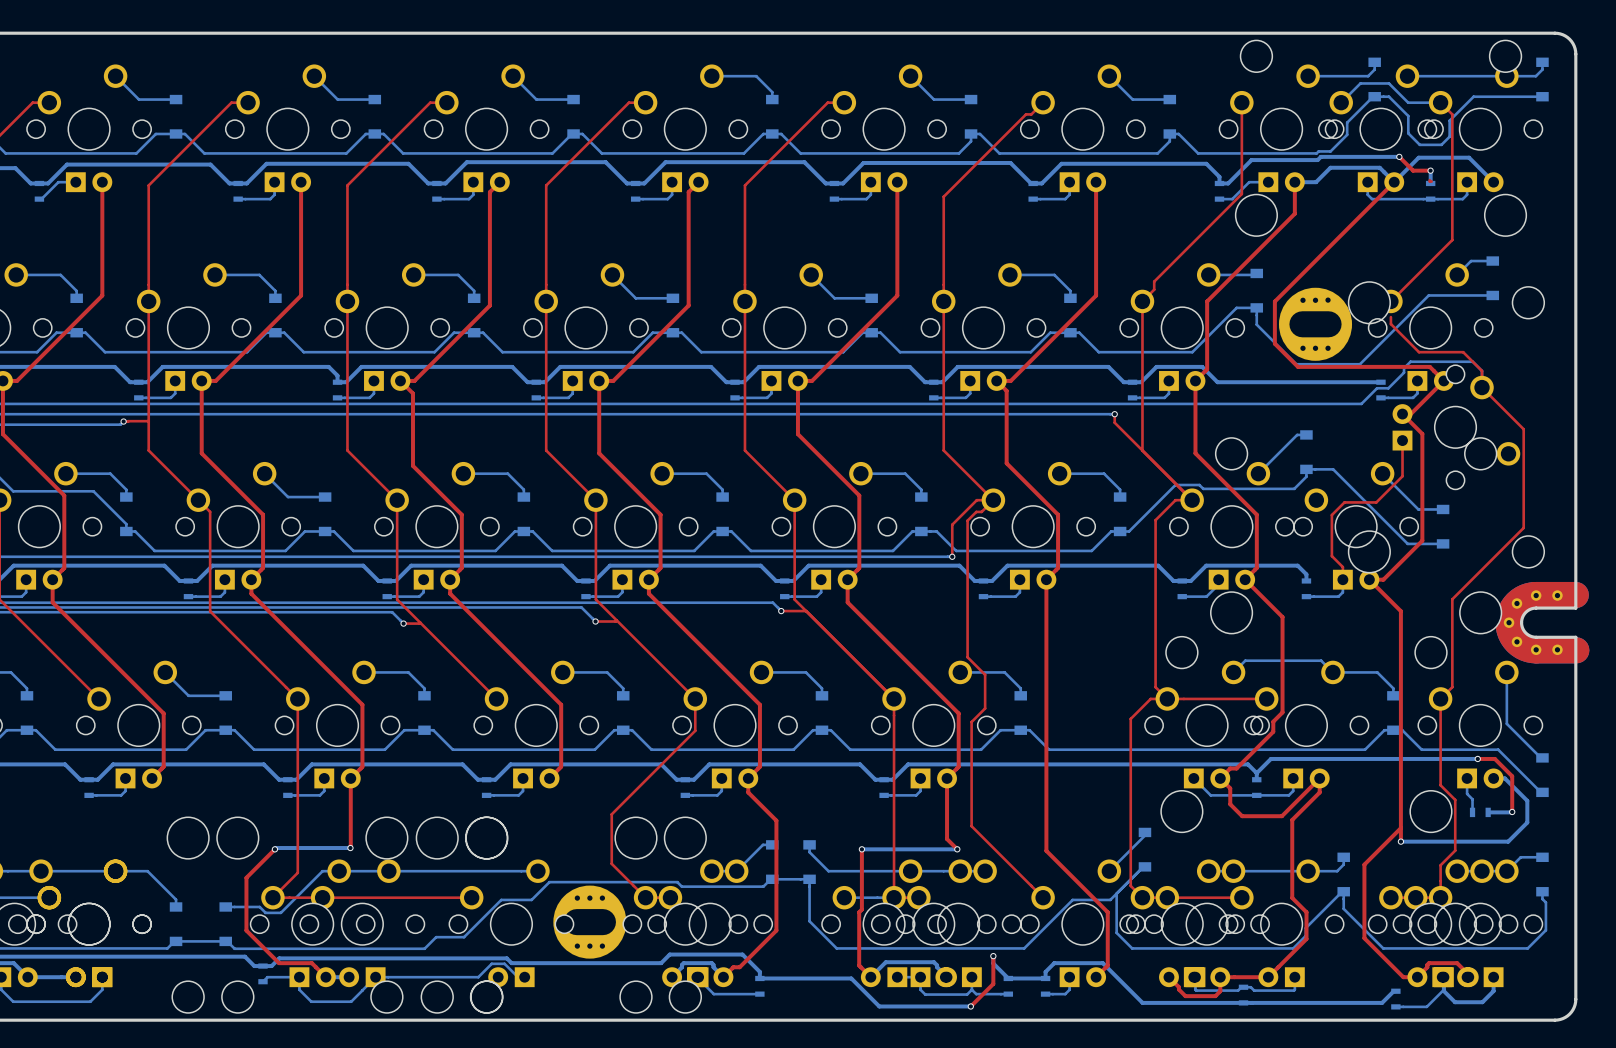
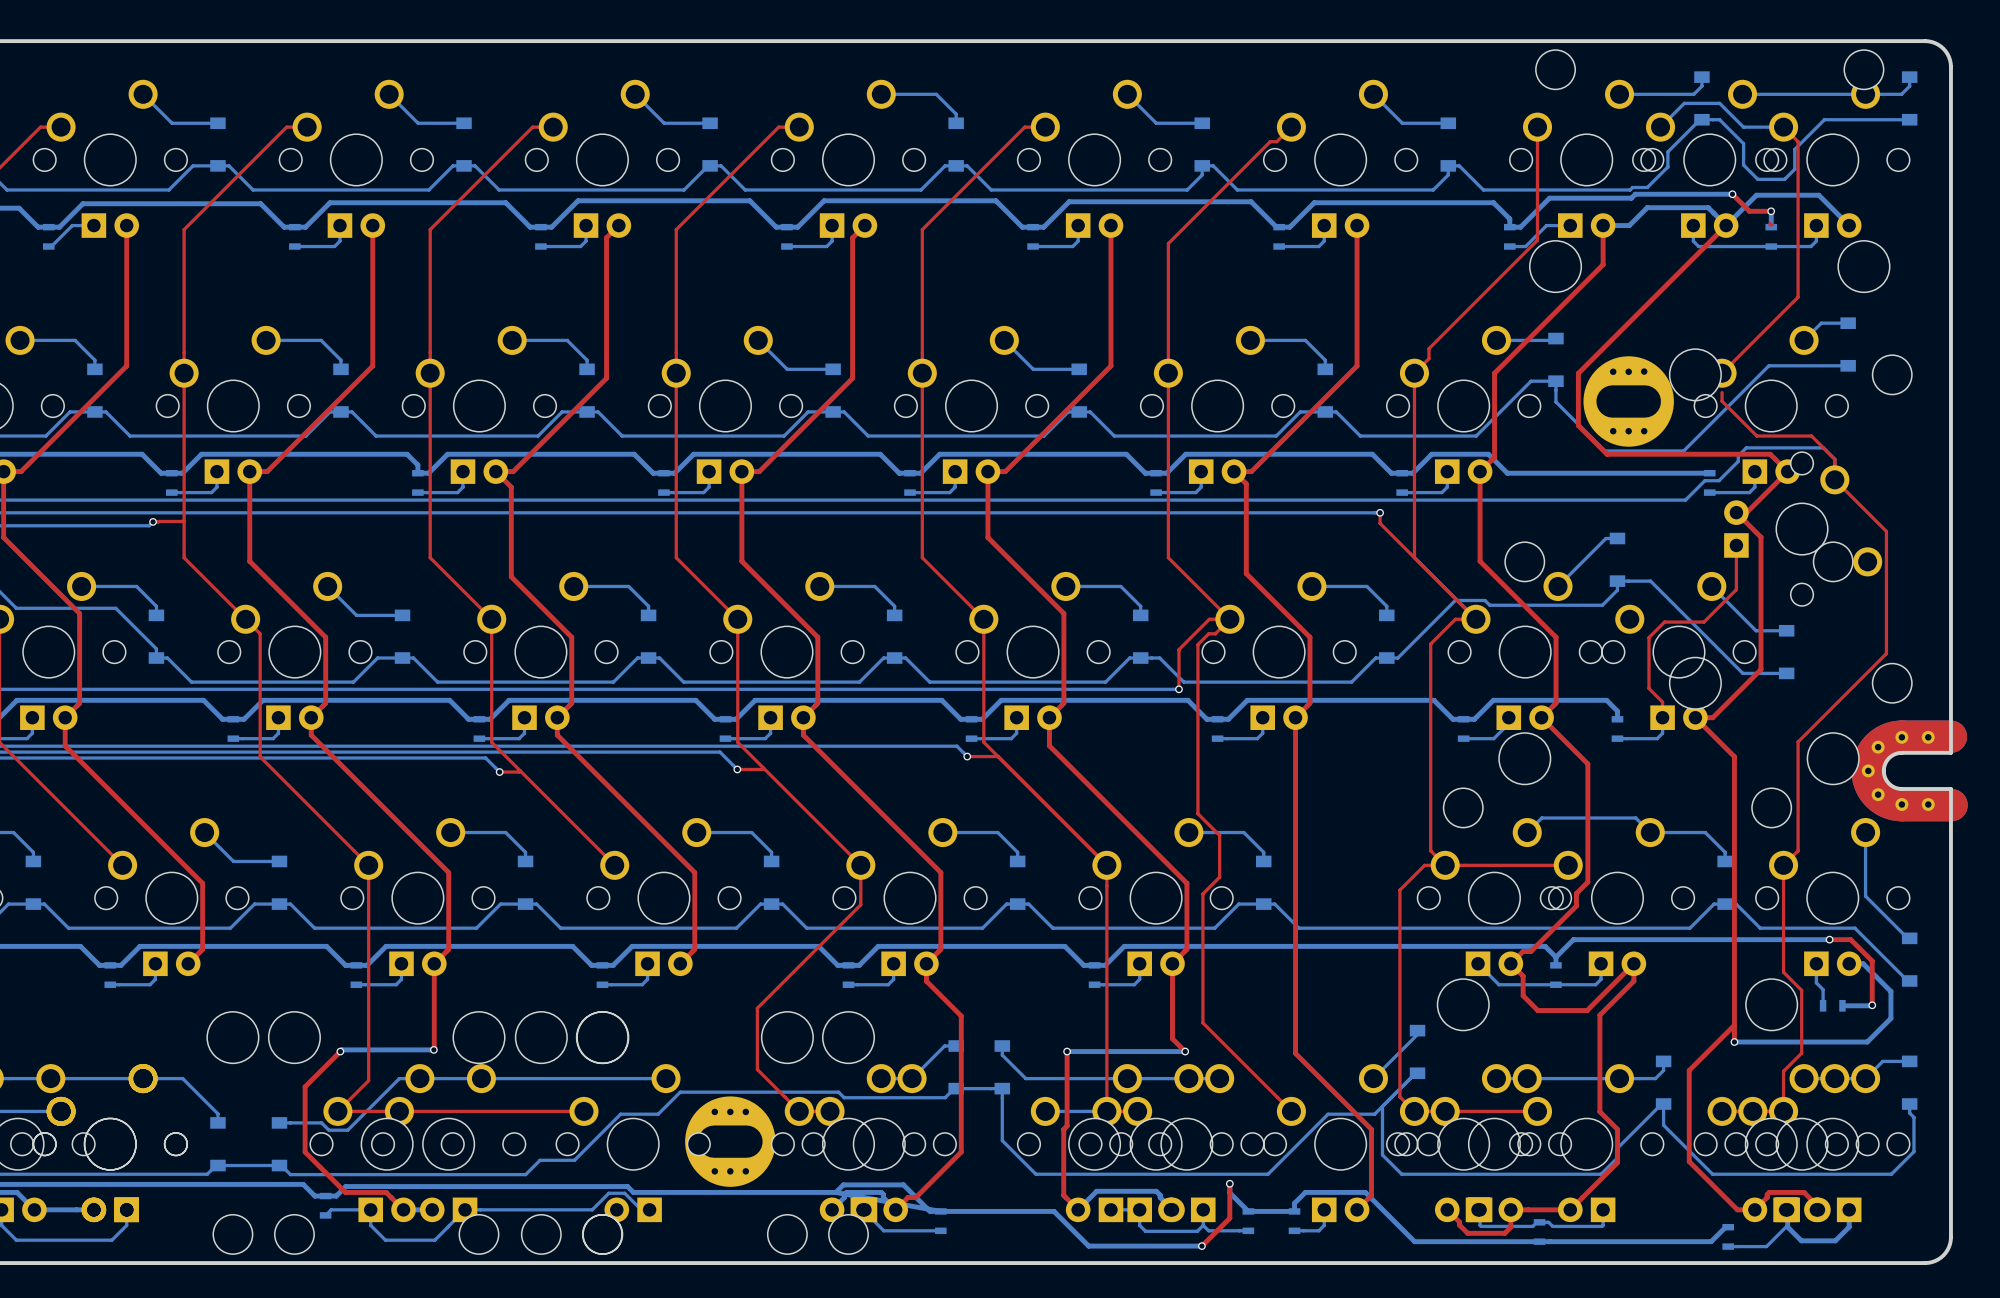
bottom track: (661, 963) (669, 954) (742, 954) (759, 971) (759, 978) -> (818, 1192) (835, 1192)
bottom track: none -> (835, 1192) (940, 1211) (930, 1211) (903, 1184) (843, 1184) (835, 1192)

